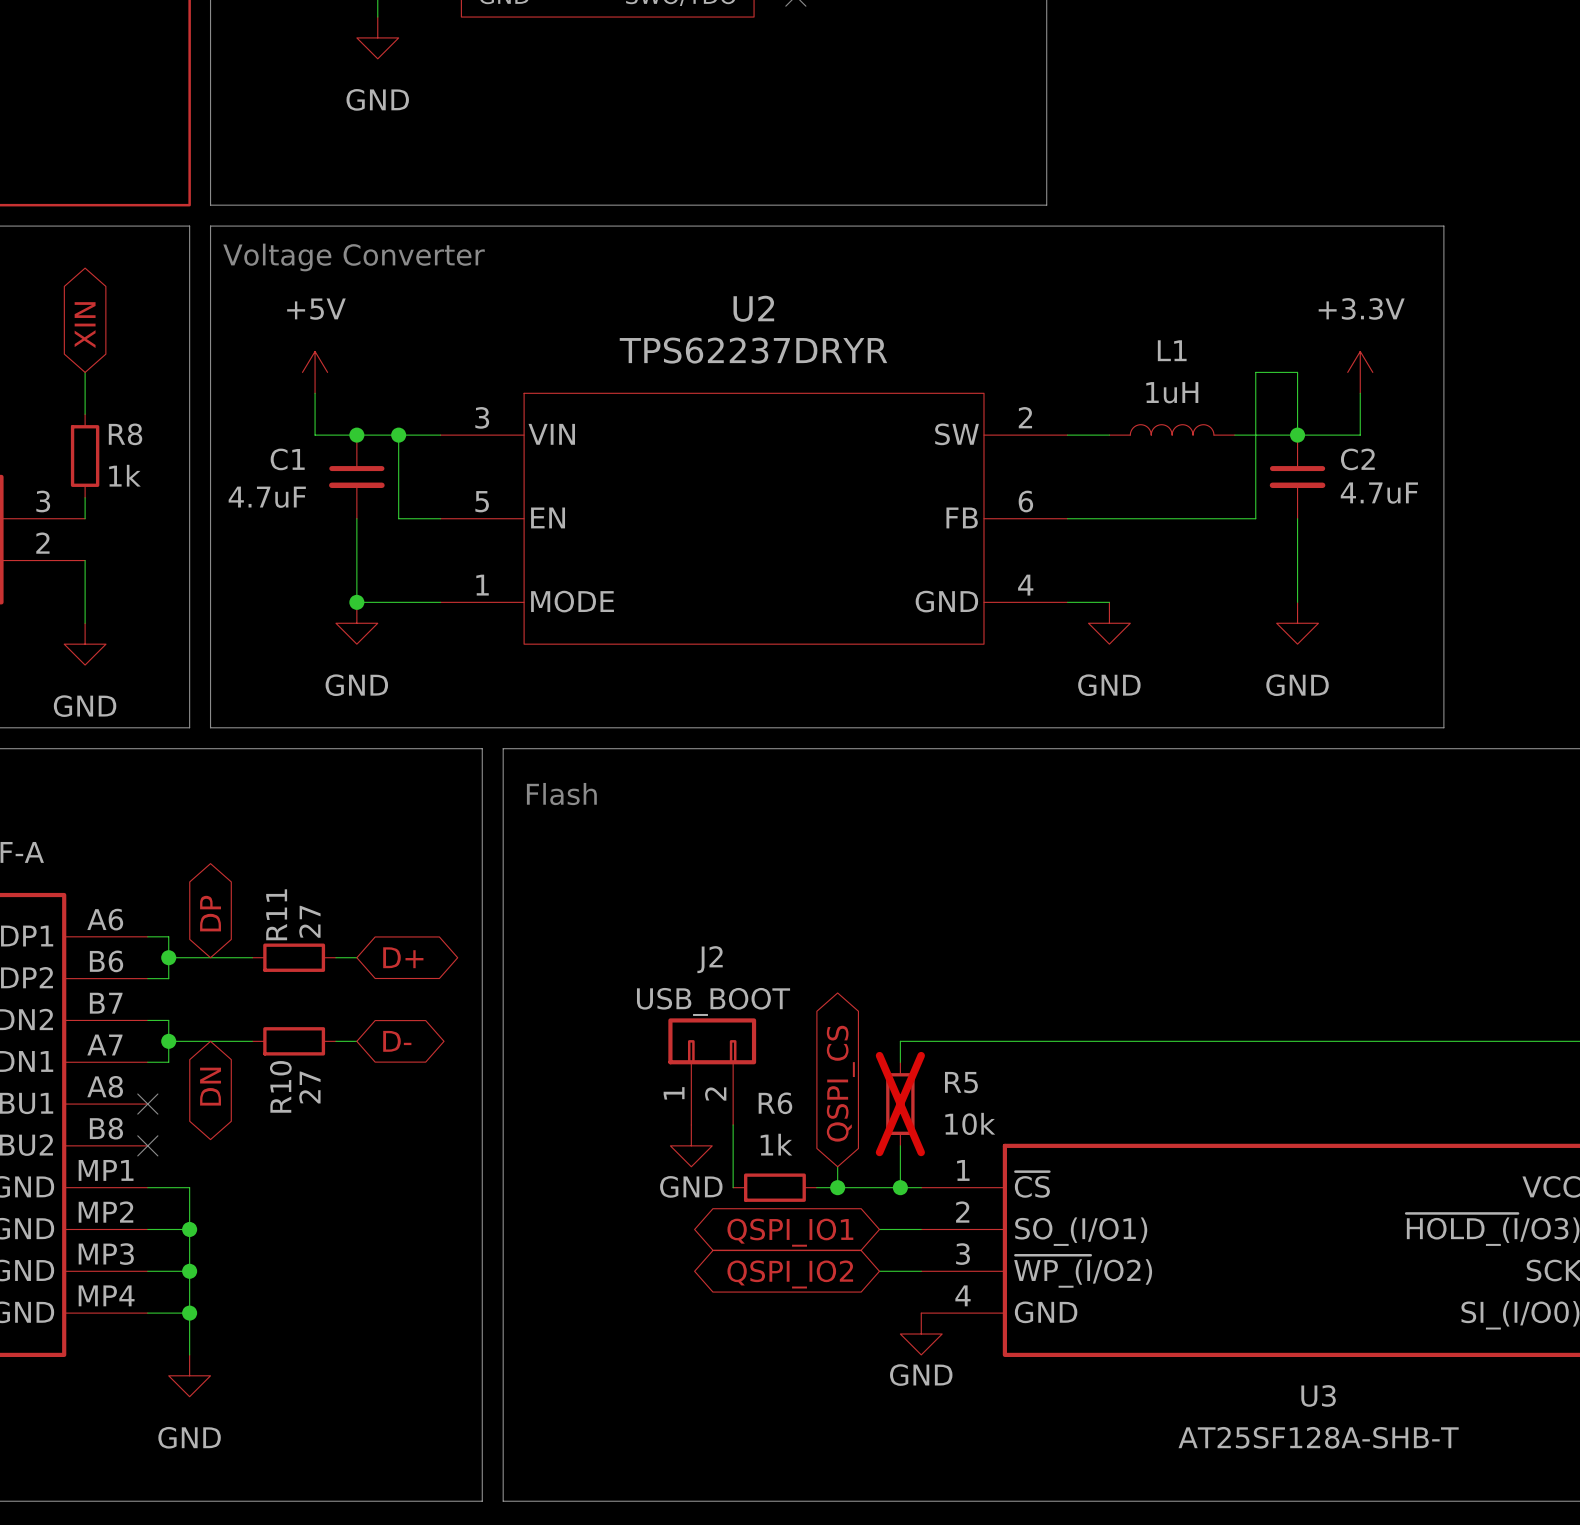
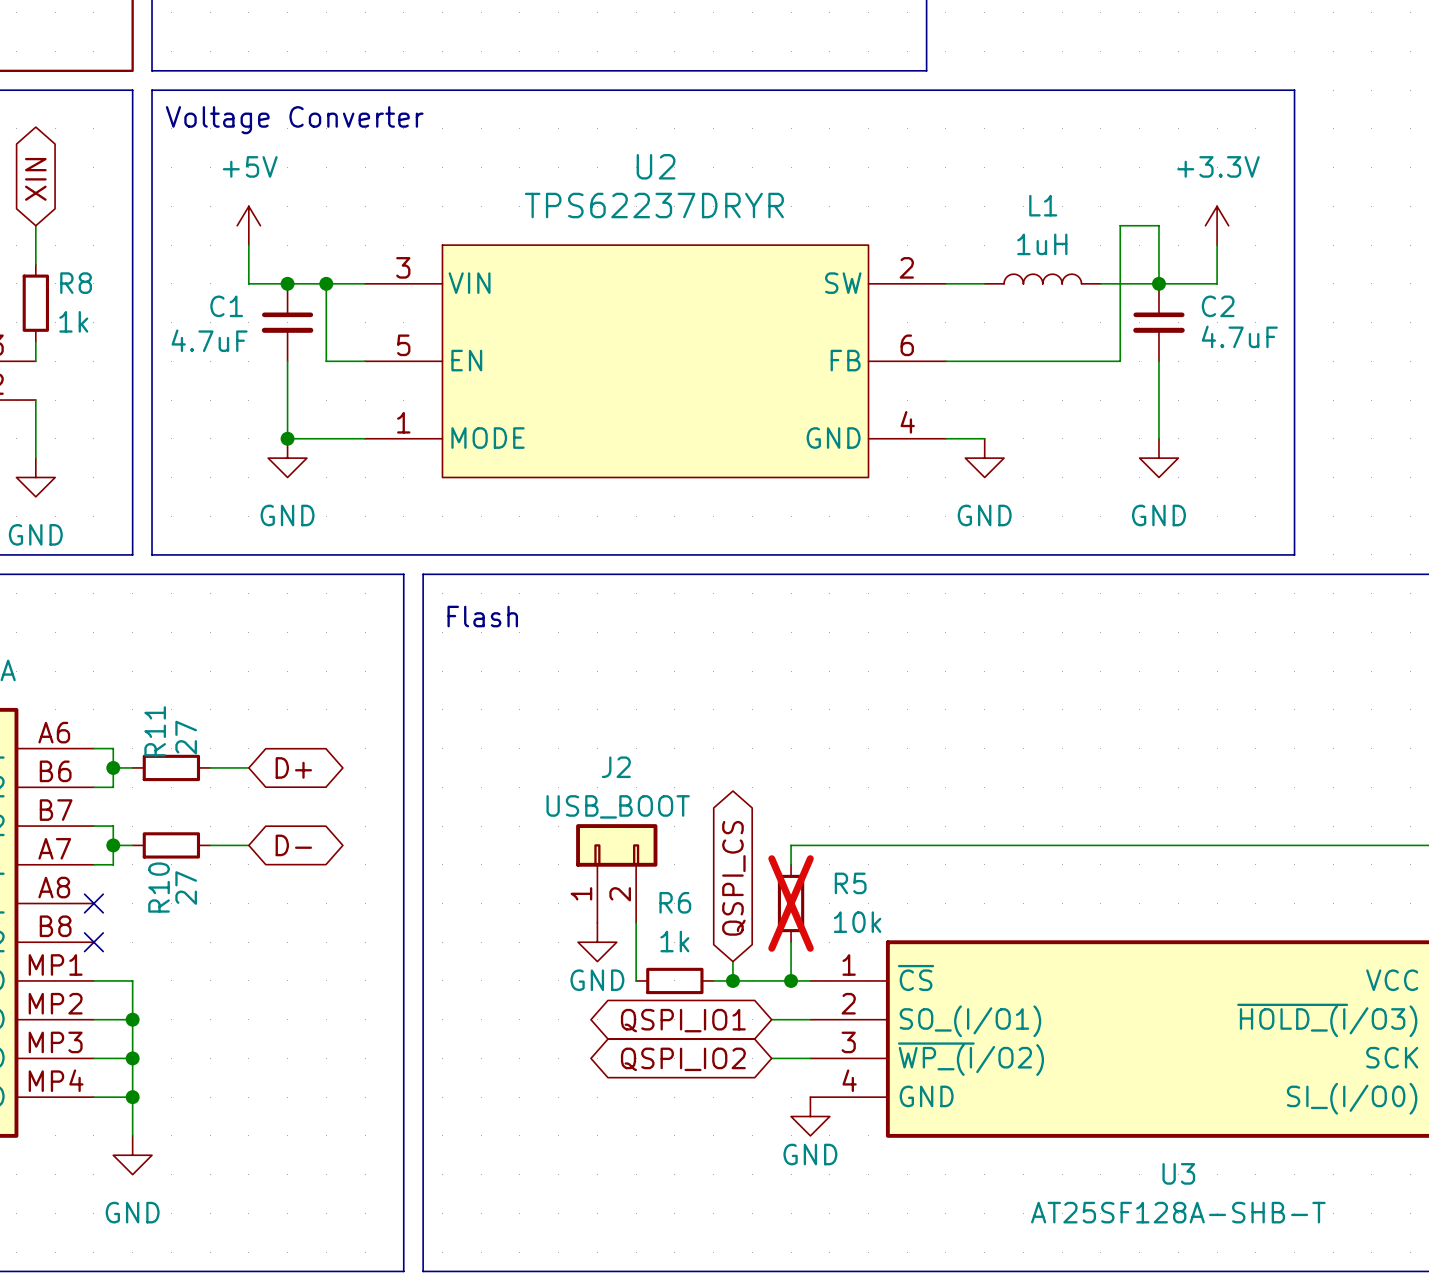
global label: DP (210, 913) -> none
wire: (189, 957) (252, 957) -> none
wire: none -> (210, 767) (248, 767)
R11 position: (294, 957) -> (171, 767)
wire: (335, 957) (356, 957) -> none
global label position: D+ (403, 957) -> D+ (293, 767)
wire: (189, 1041) (252, 1041) -> none
wire: none -> (210, 845) (248, 845)
R10 position: (294, 1041) -> (171, 845)
wire: (335, 1041) (356, 1041) -> none
global label position: D- (397, 1041) -> D- (293, 845)
global label: DN (210, 1086) -> none

